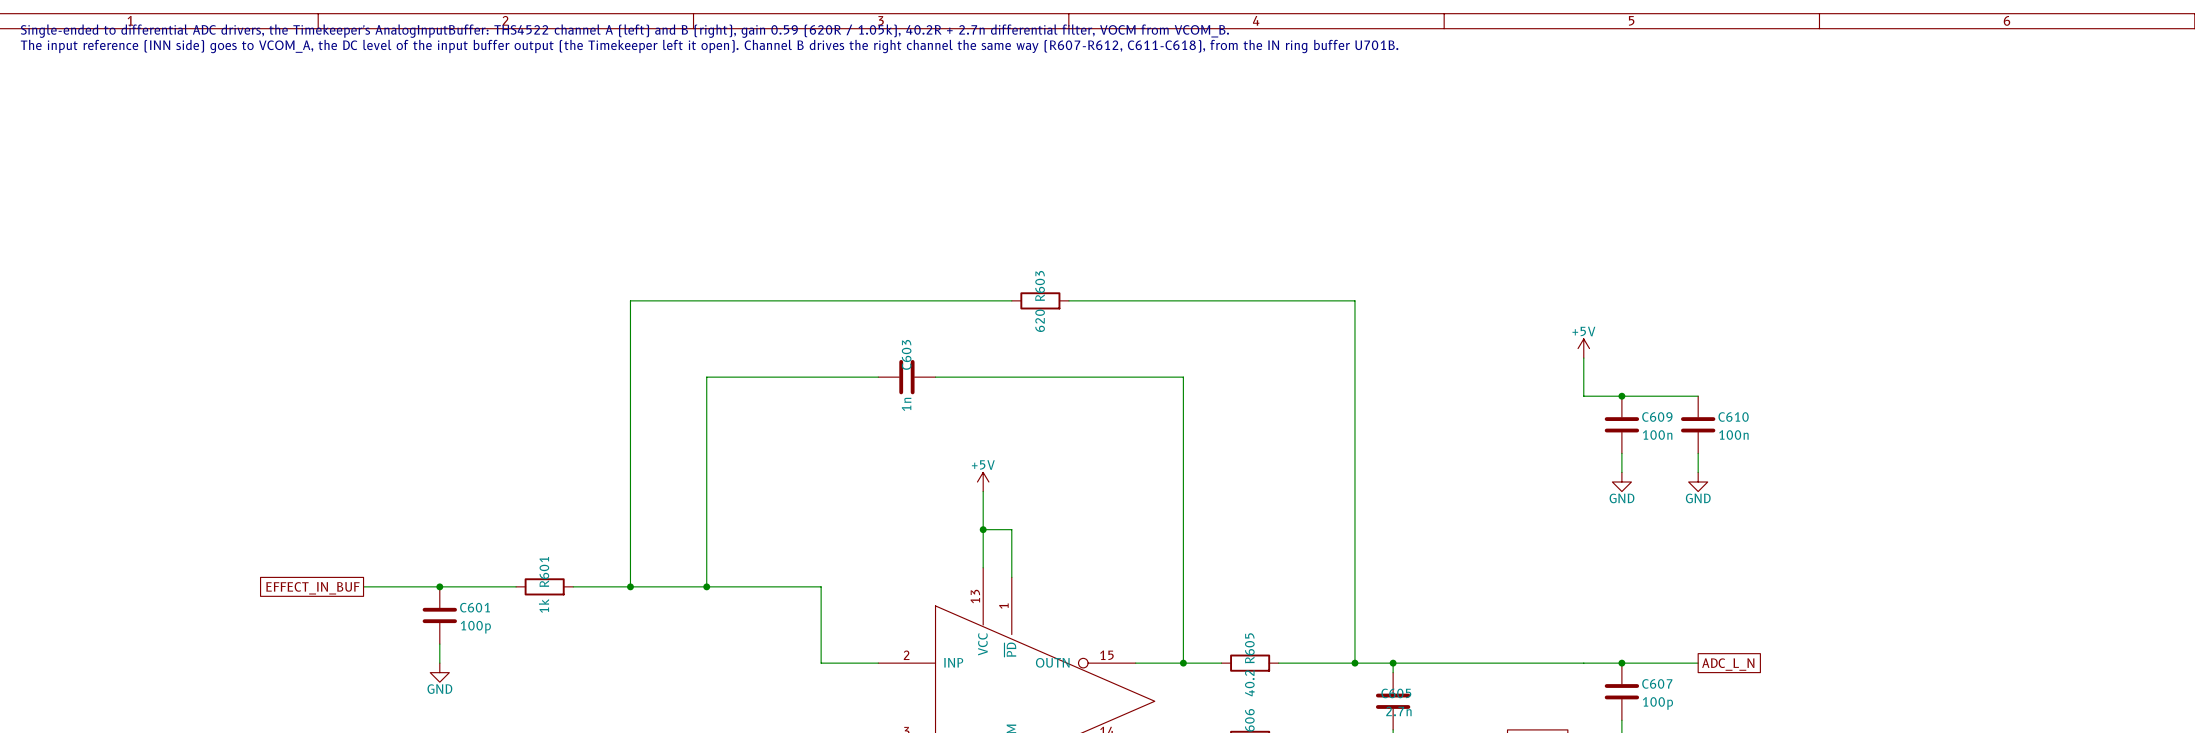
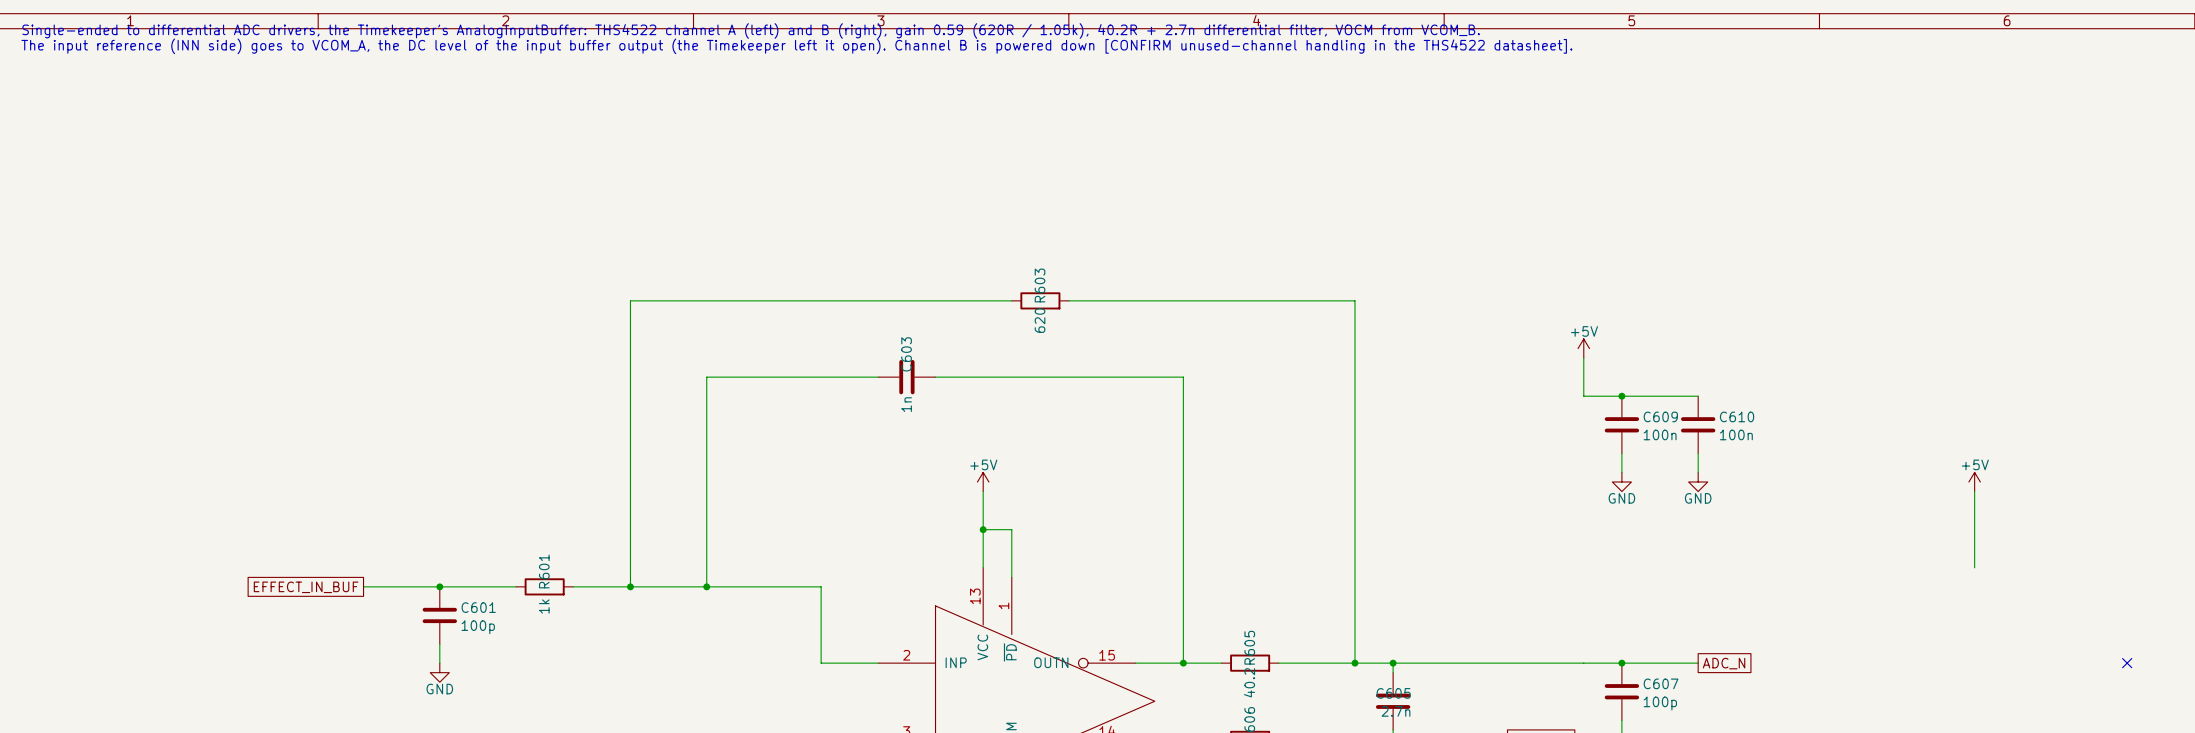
text: The input reference (INN side) goes to VCOM_A, the DC level of the input buffer output (the Timekeeper left it open). Channel B drives the right channel the same way (R607-R612, C611-C618), from the IN ring buffer U701B. (709, 46) -> The input reference (INN side) goes to VCOM_A, the DC level of the input buffer output (the Timekeeper left it open). Channel B is powered down [CONFIRM unused-channel handling in the THS4522 datasheet]. (796, 46)
power symbol: none -> +5V (1974, 482)
wire: none -> (1974, 491) (1974, 567)
no-connect mark: none -> (2127, 663)
global label: ADC_L_N (1728, 664) -> ADC_N (1724, 663)

